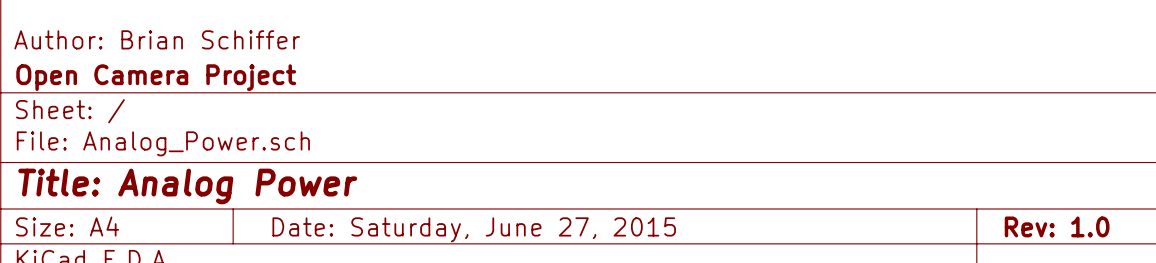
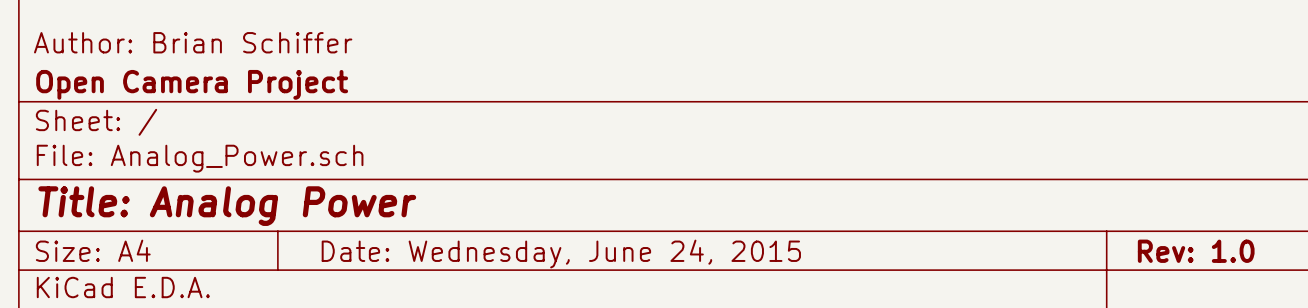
title block: Date: Saturday, June 27, 2015 (474, 229) -> Date: Wednesday, June 24, 2015 (561, 254)

